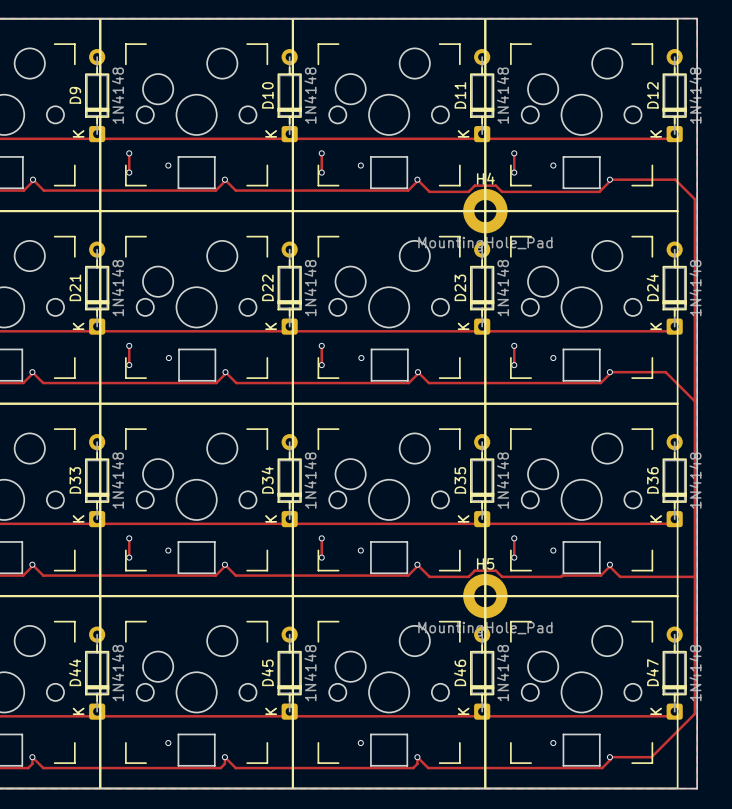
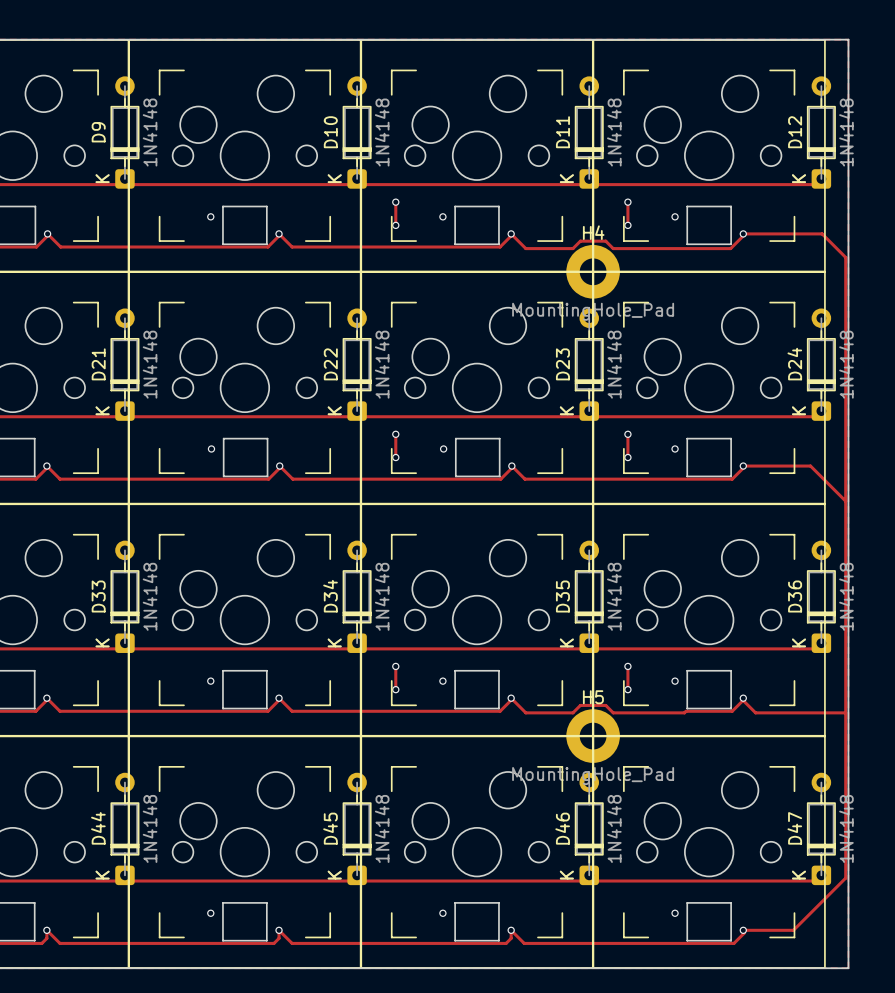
track: (129, 153) (129, 172) -> none
via: (129, 153) -> none
via: (129, 172) -> none
track: (129, 345) (129, 365) -> none
via: (129, 345) -> none
via: (129, 365) -> none
track: (129, 538) (129, 557) -> none
via: (129, 538) -> none
via: (129, 557) -> none

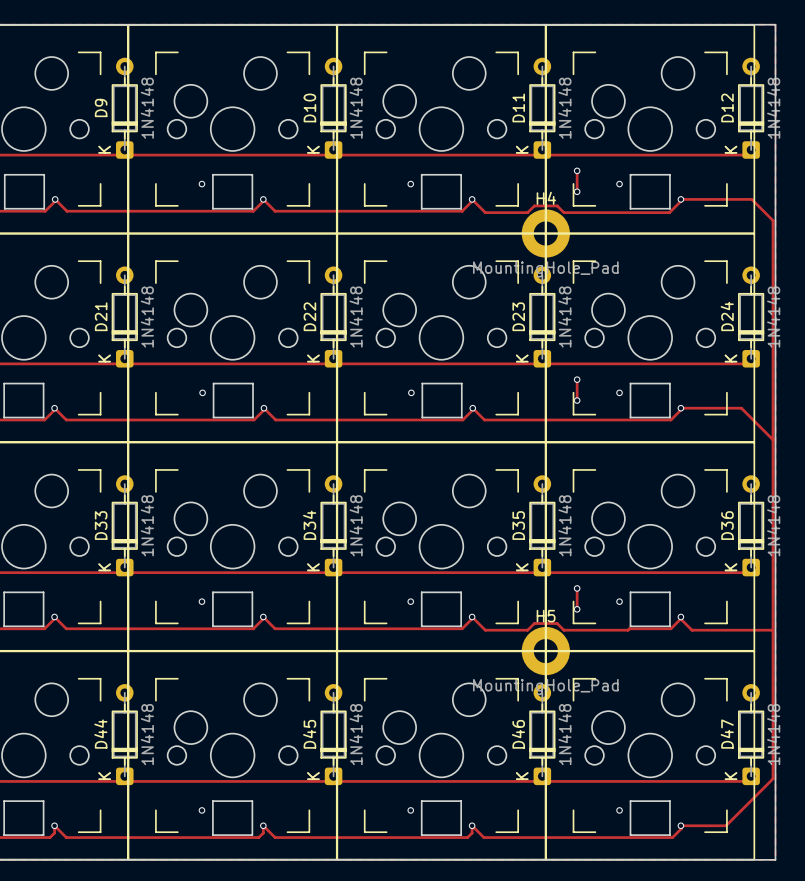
track: (395, 202) (395, 225) -> none
via: (395, 202) -> none
via: (395, 225) -> none
track: (395, 434) (395, 457) -> none
via: (395, 434) -> none
via: (395, 457) -> none
track: (395, 666) (395, 689) -> none
via: (395, 666) -> none
via: (395, 689) -> none

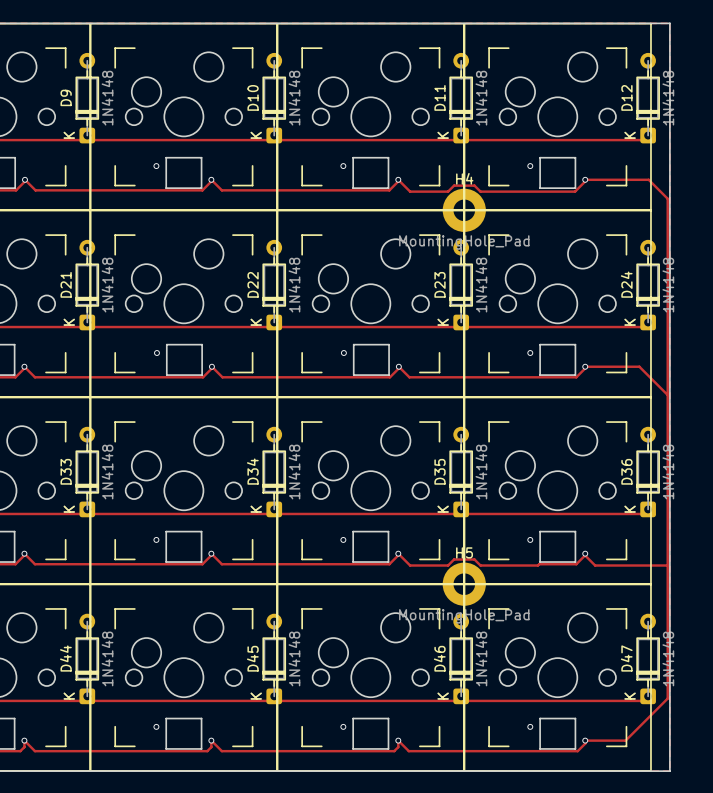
track: (577, 170) (577, 191) -> none
via: (577, 170) -> none
via: (577, 191) -> none
track: (577, 379) (577, 400) -> none
via: (577, 379) -> none
via: (577, 400) -> none
track: (577, 588) (577, 609) -> none
via: (577, 588) -> none
via: (577, 609) -> none

